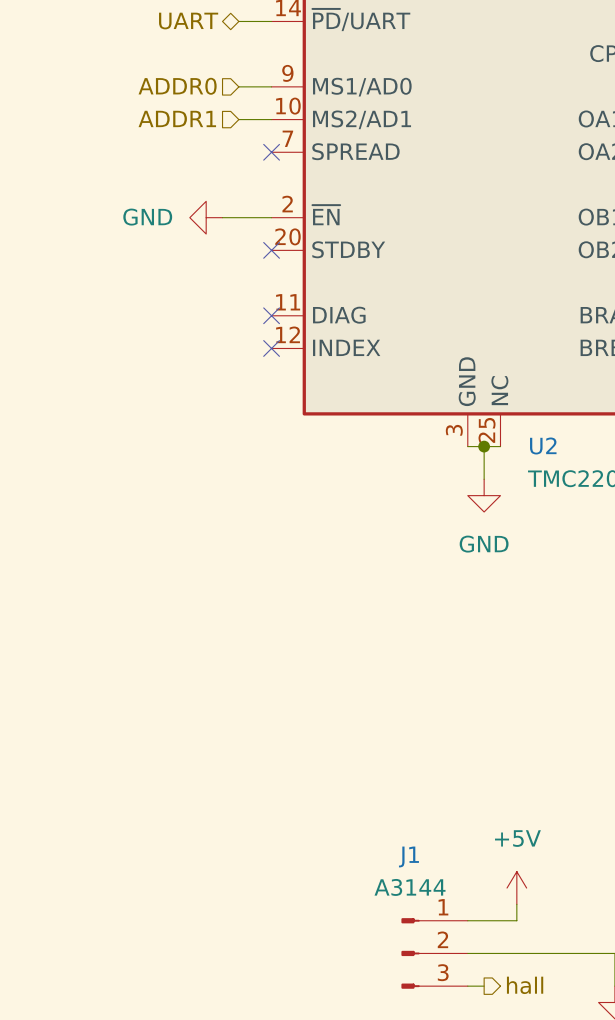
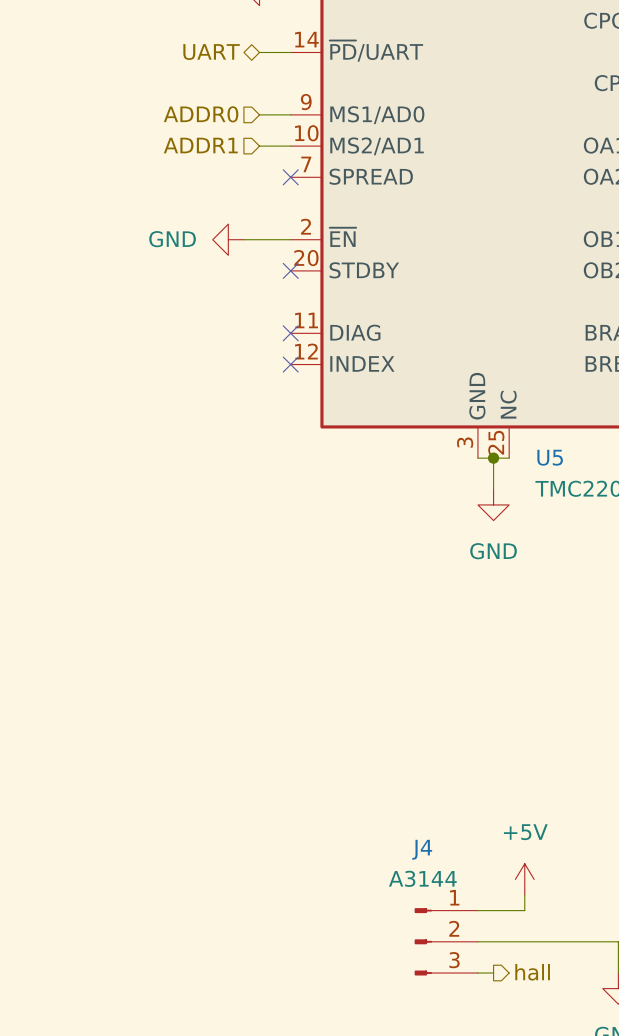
U2 name: U2 (543, 445) -> U5 (550, 457)
J1 name: J1 (408, 856) -> J4 (422, 849)

